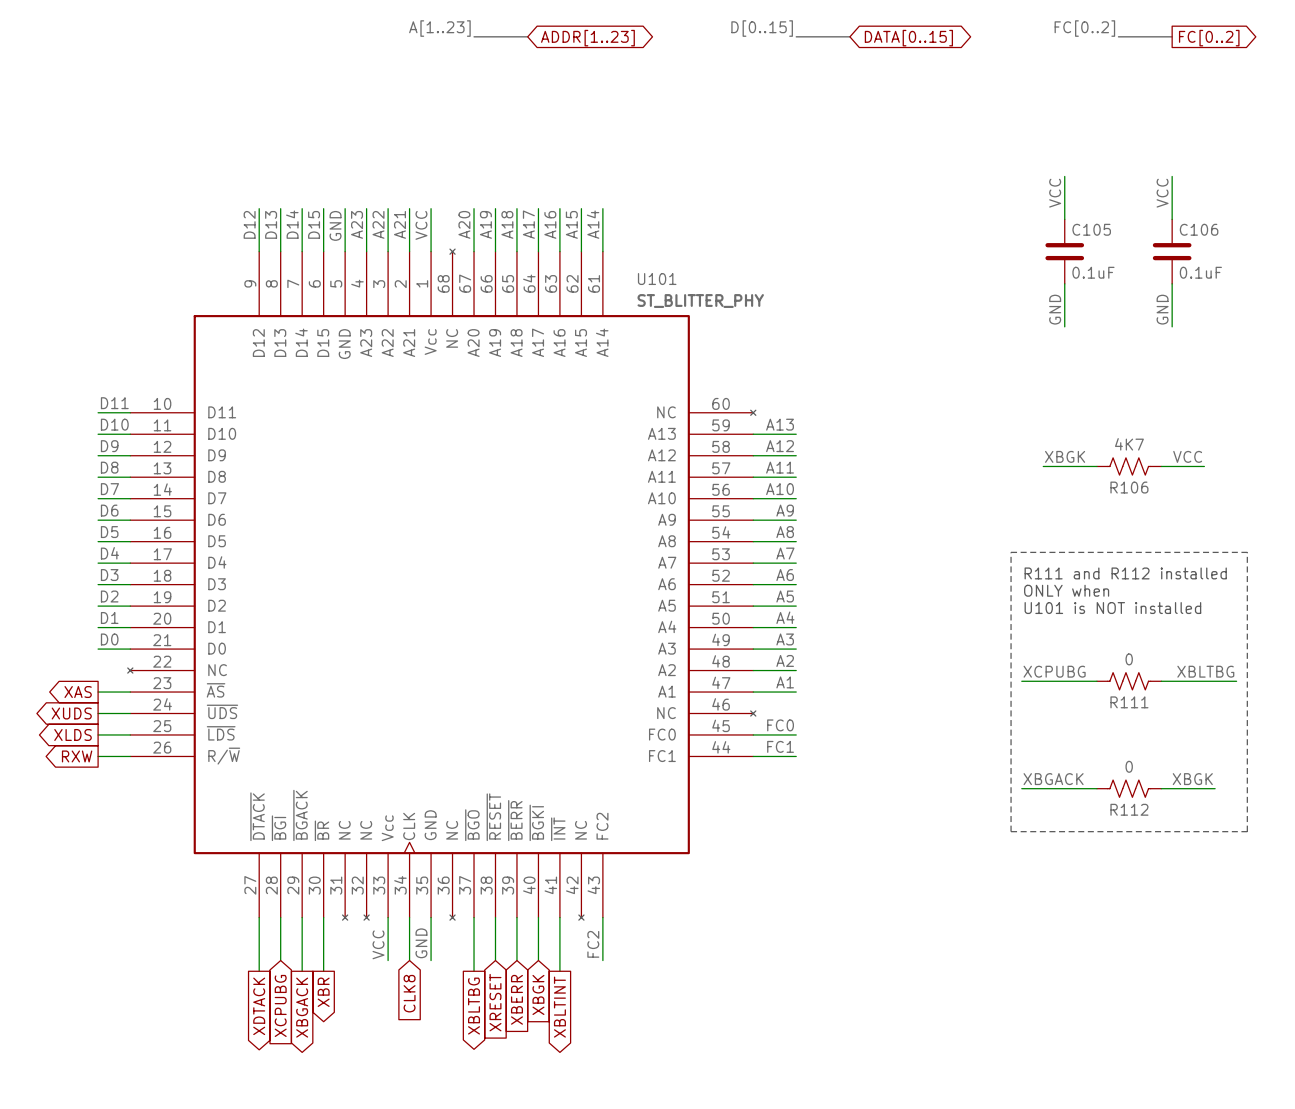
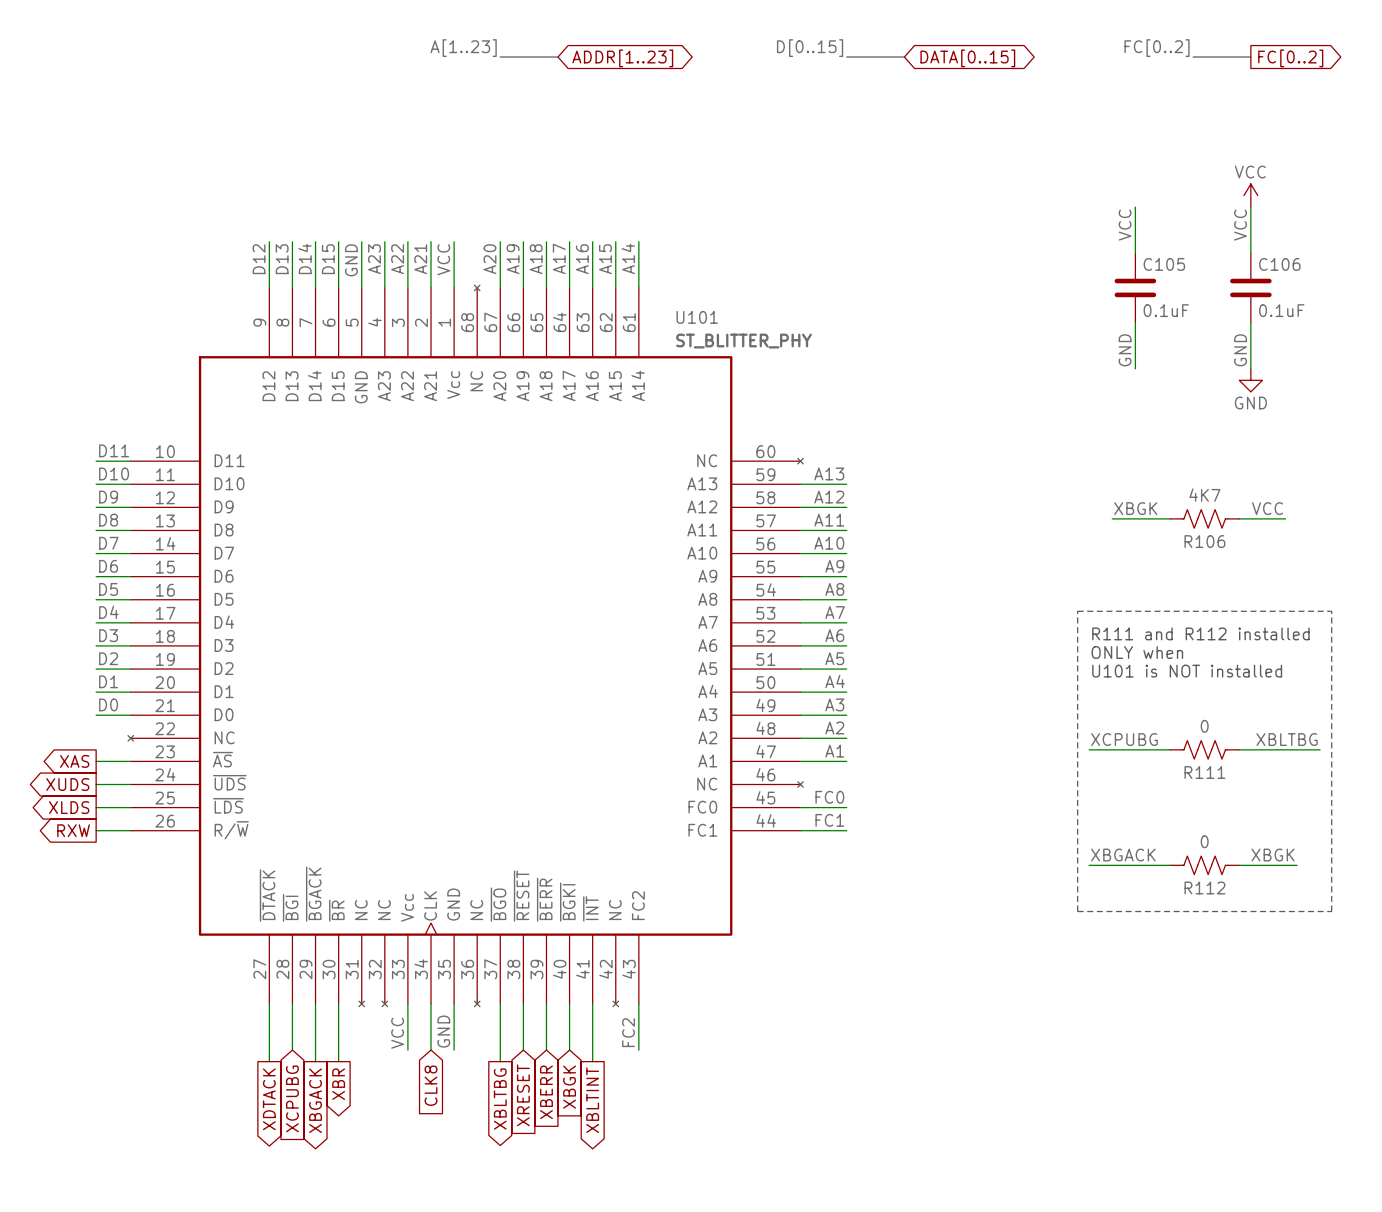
power symbol: none -> VCC (1250, 195)
power symbol: none -> GND (1250, 380)

